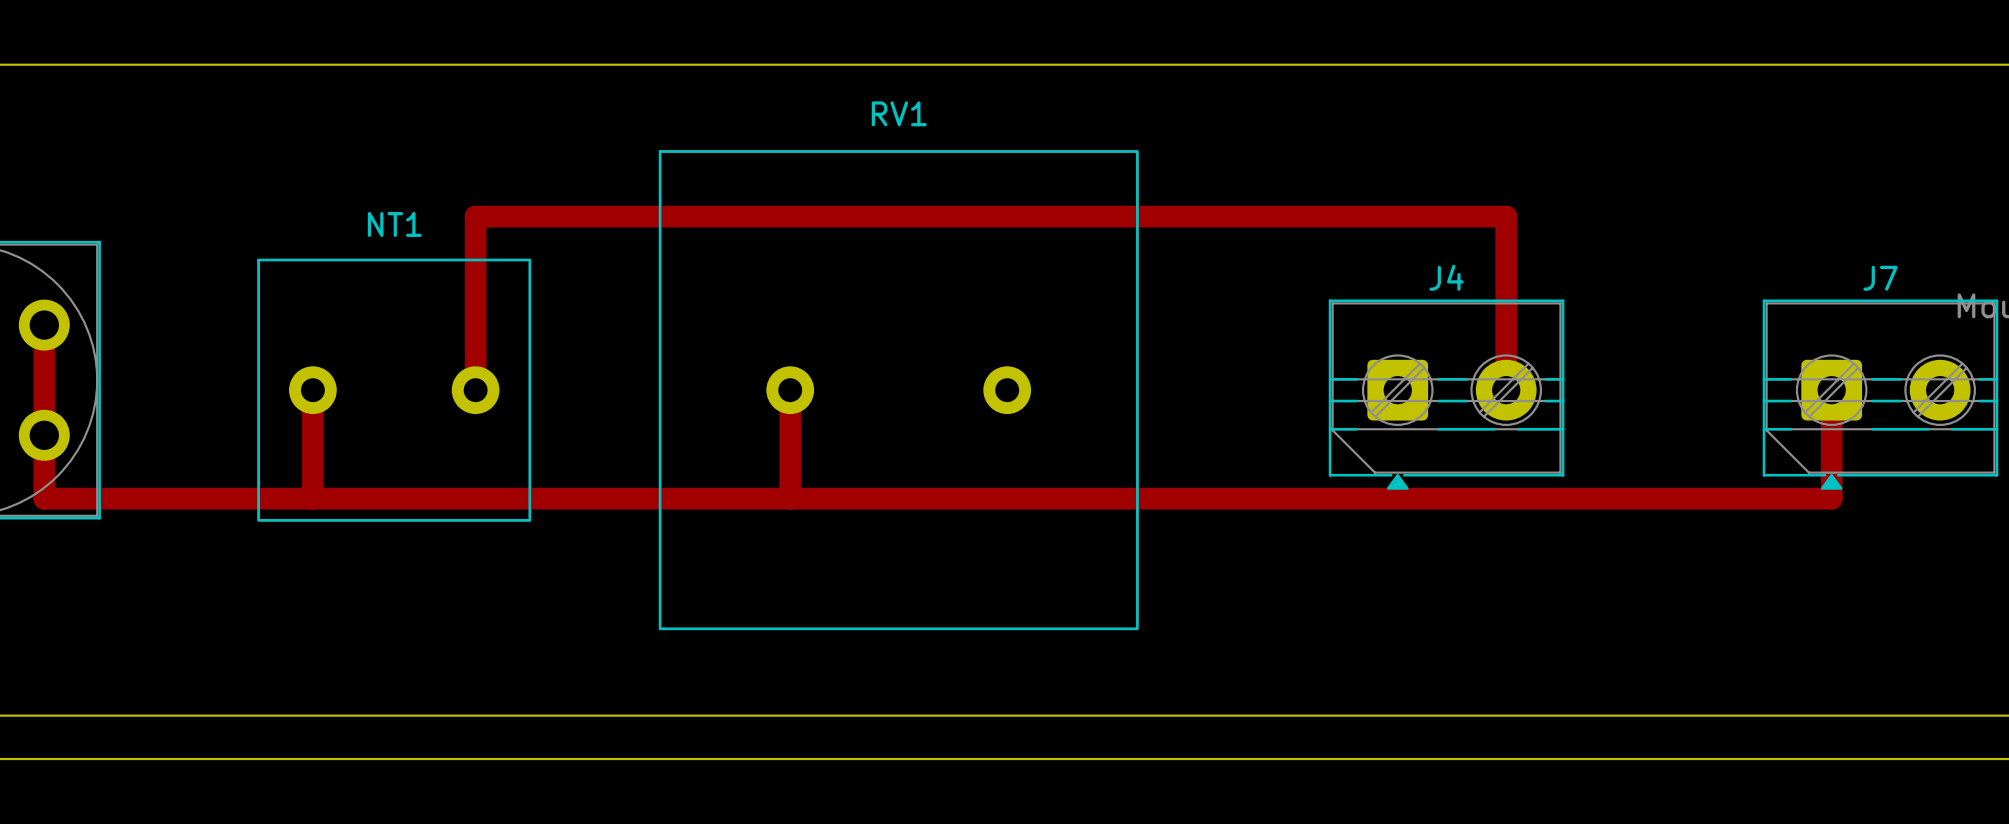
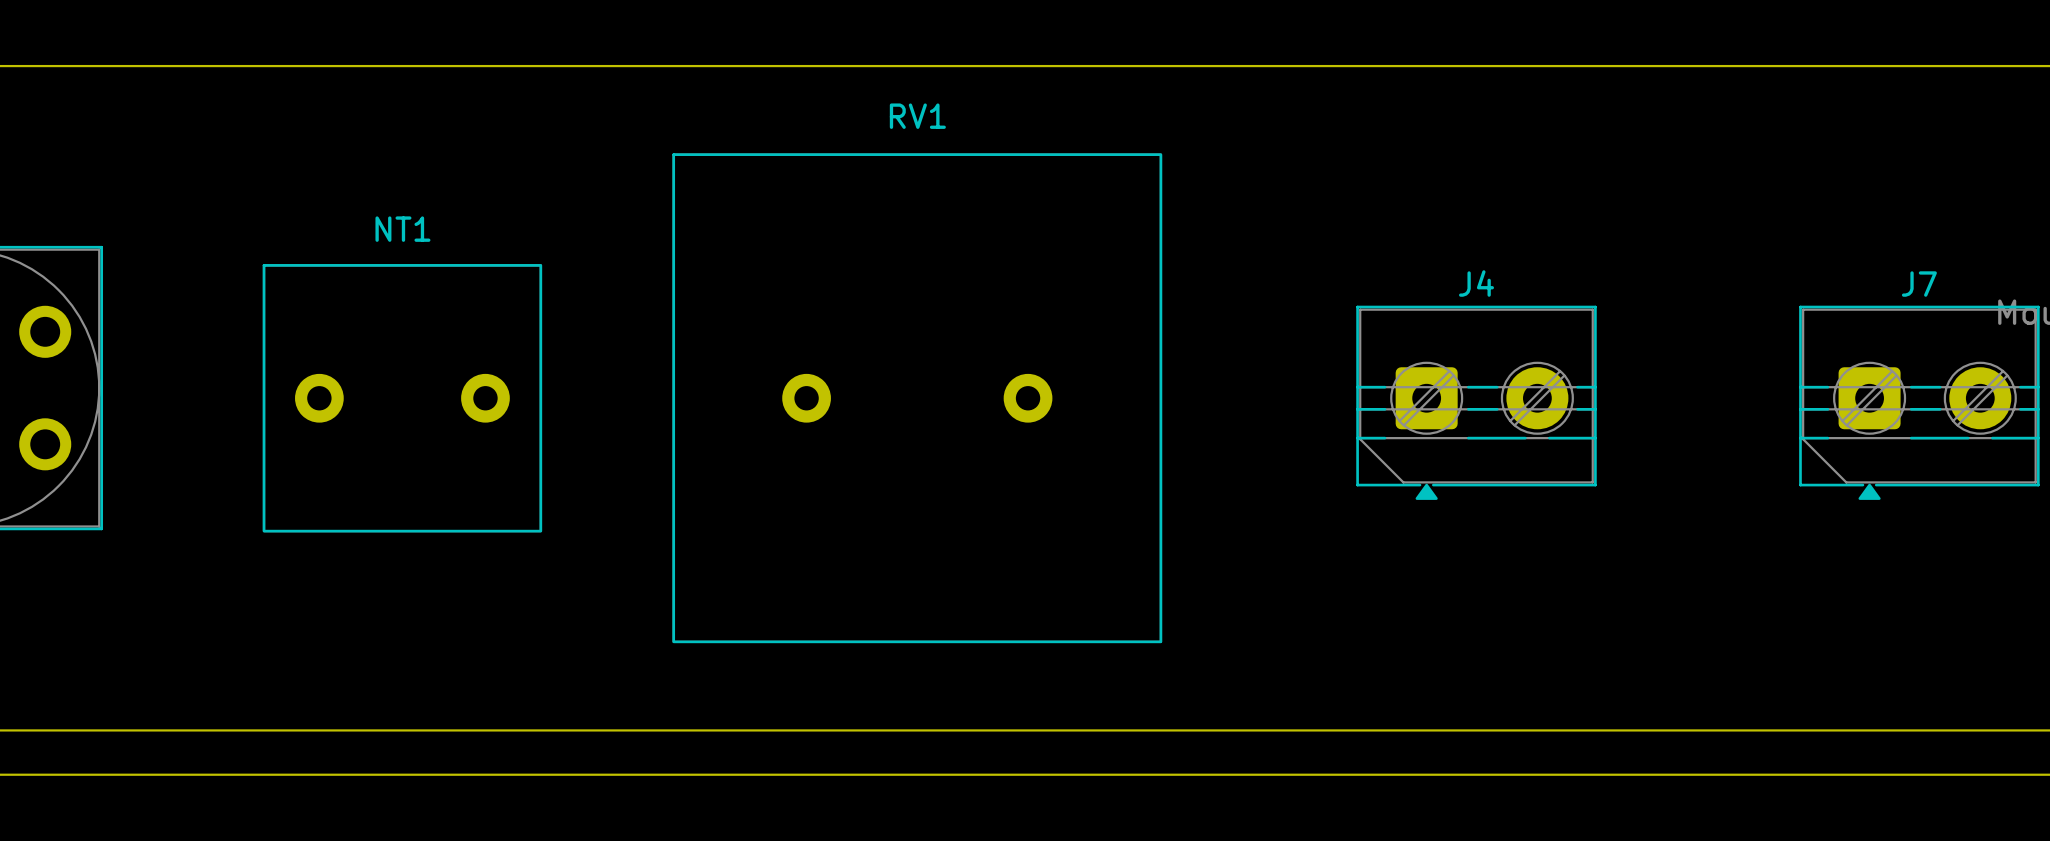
track: (44, 325) (44, 498) (1831, 498) (1831, 390) -> none
track: (312, 390) (312, 498) -> none
track: (475, 390) (475, 216) (1506, 216) (1506, 390) -> none
track: (790, 390) (790, 498) -> none

